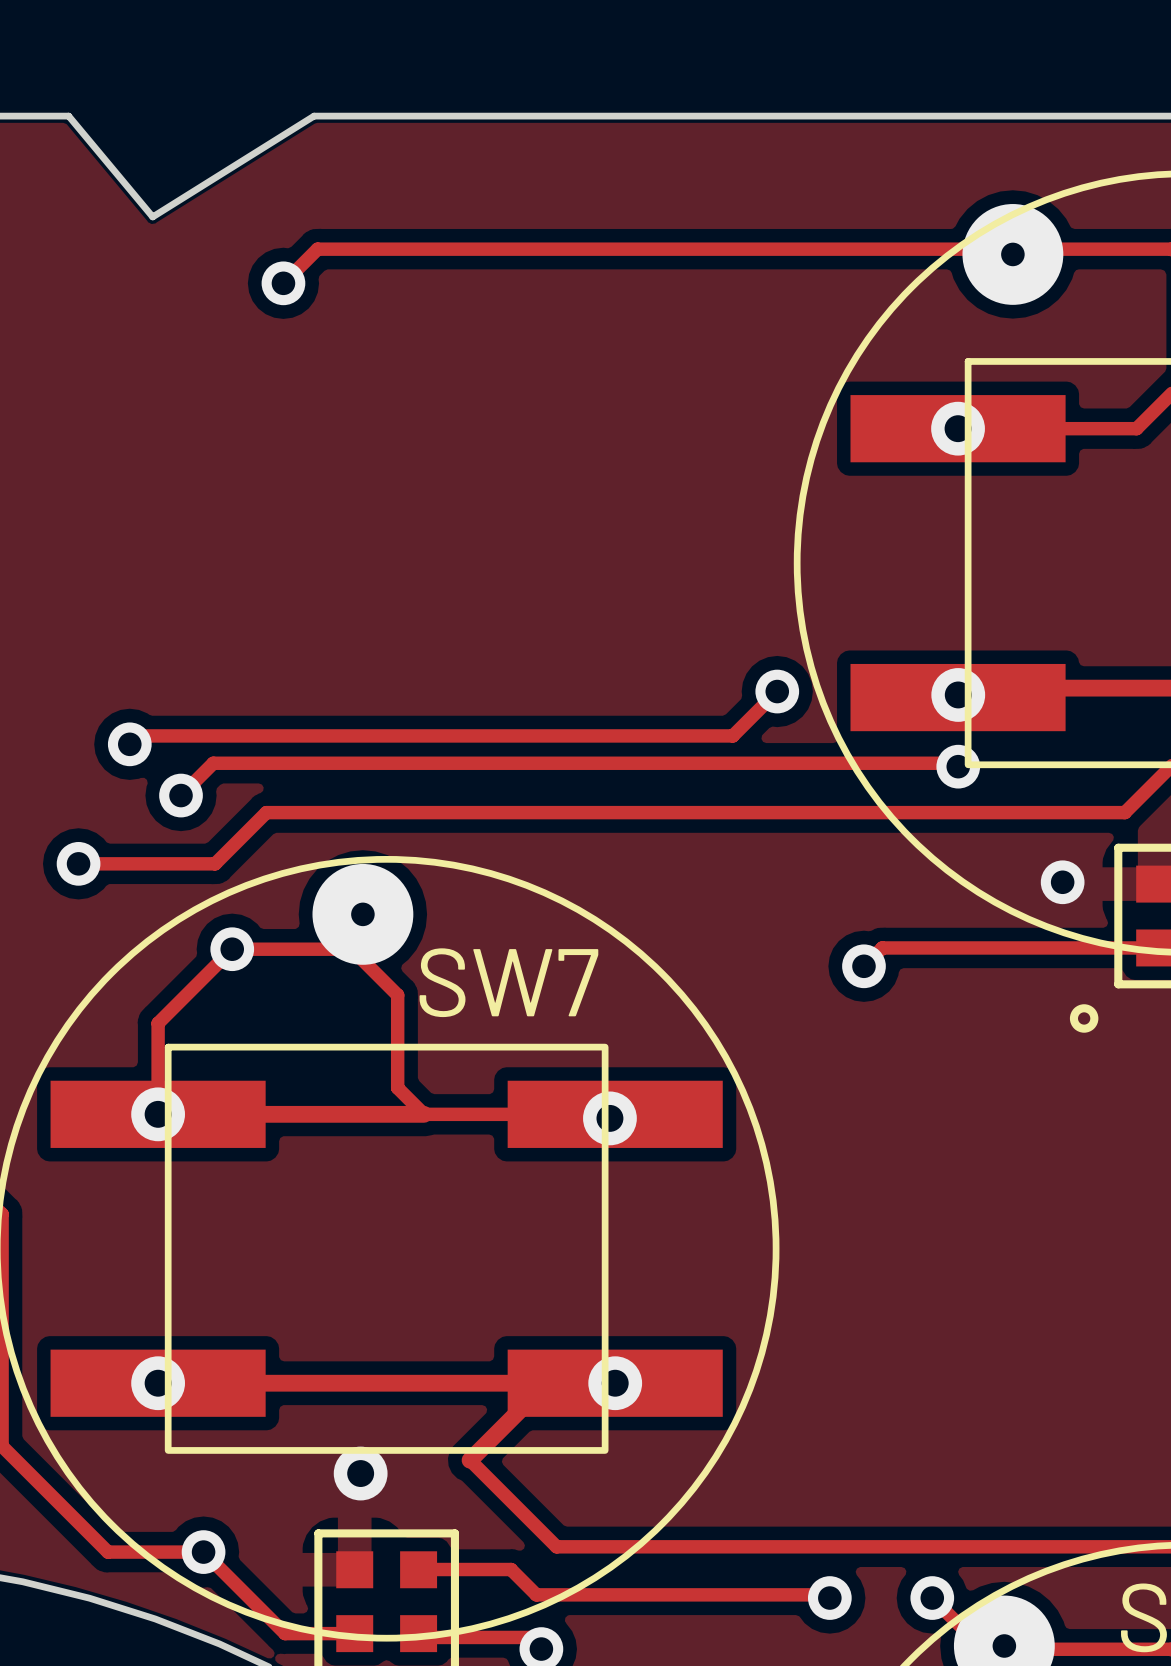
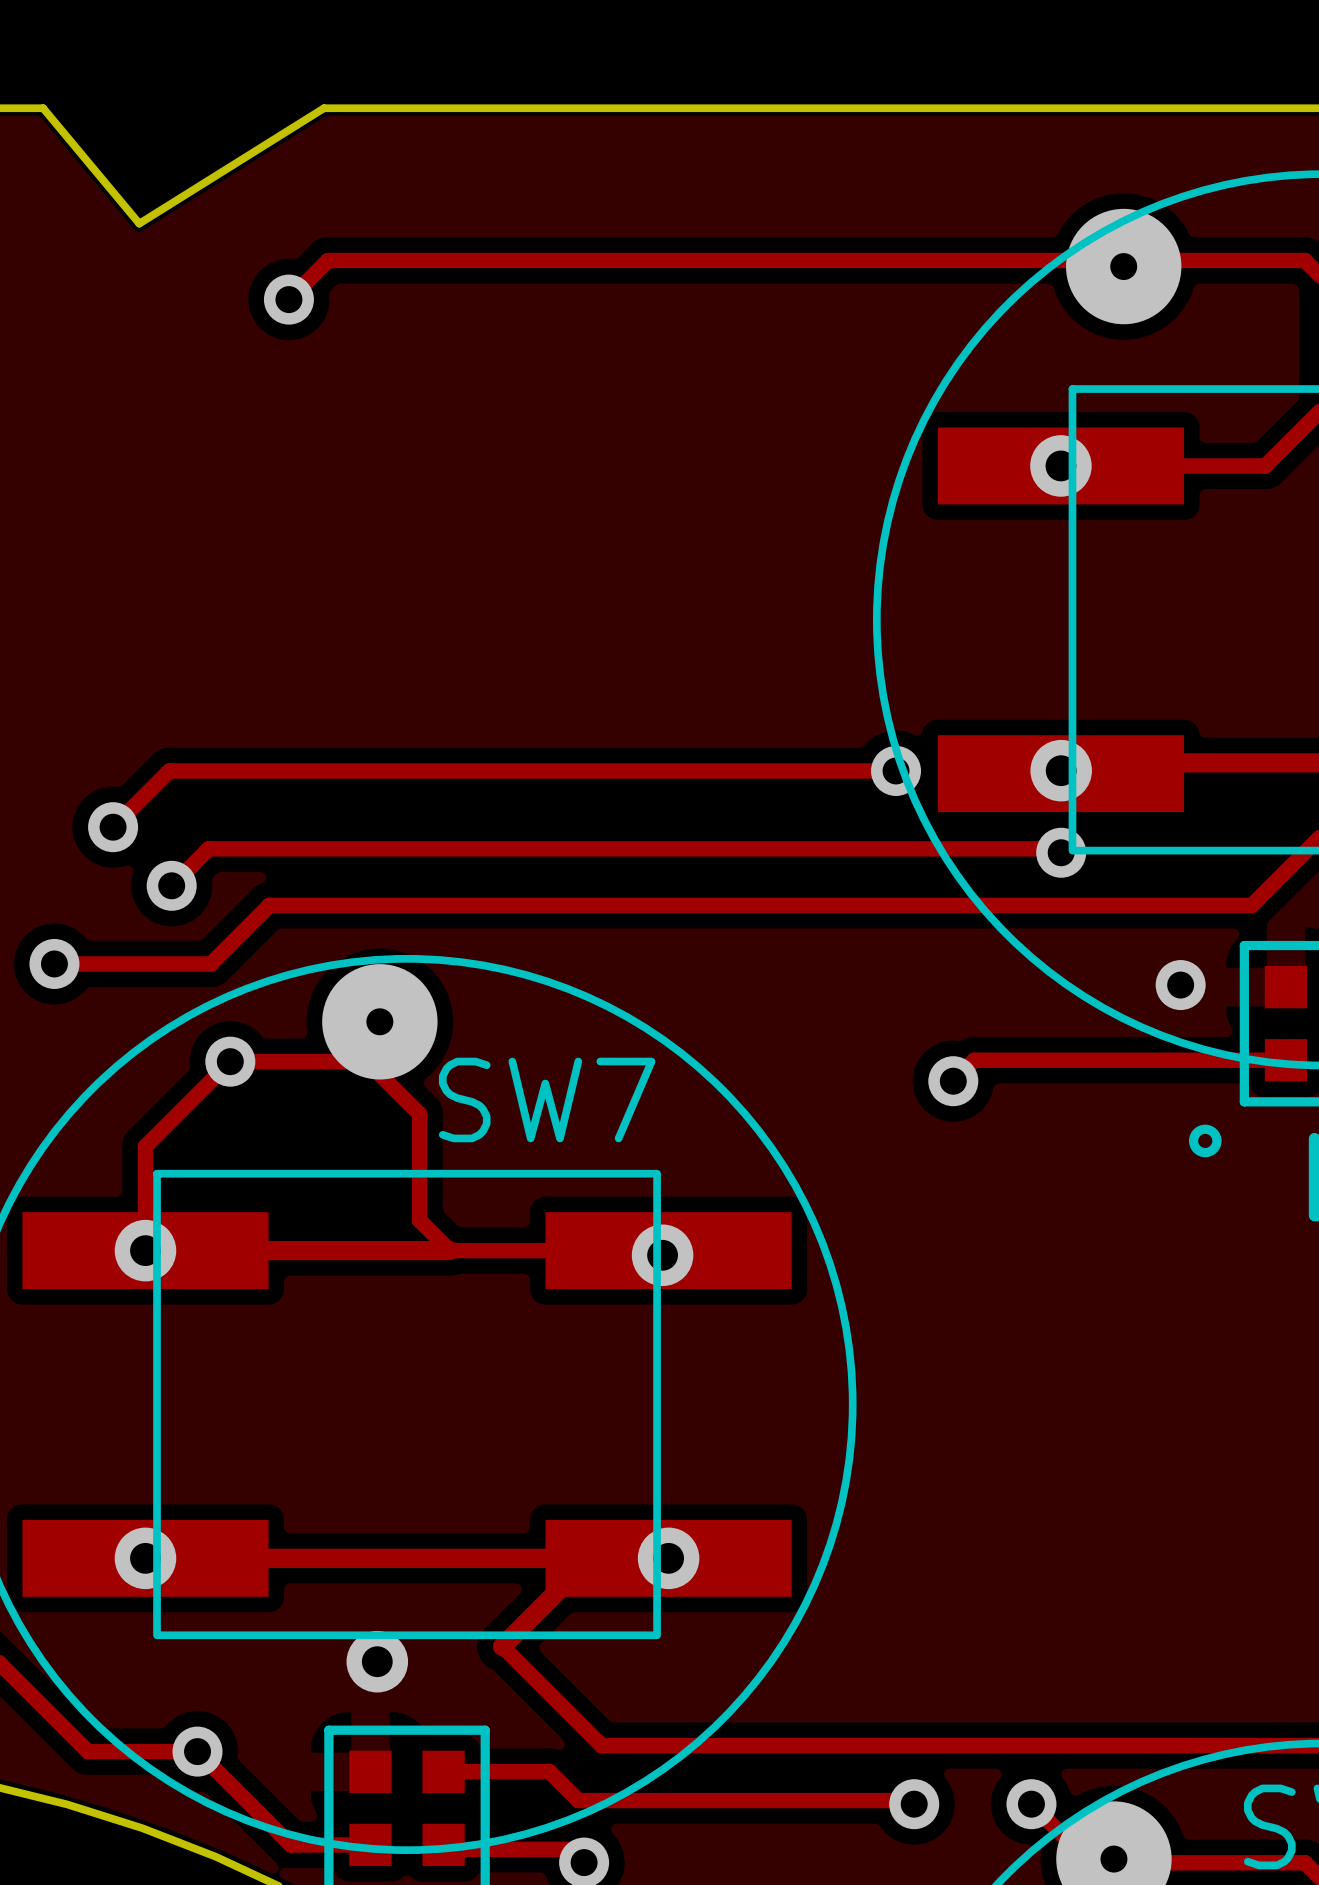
track: (777, 691) (732, 735) (138, 735) -> (896, 770) (169, 770) (122, 817)
via position: (777, 691) -> (896, 770)

